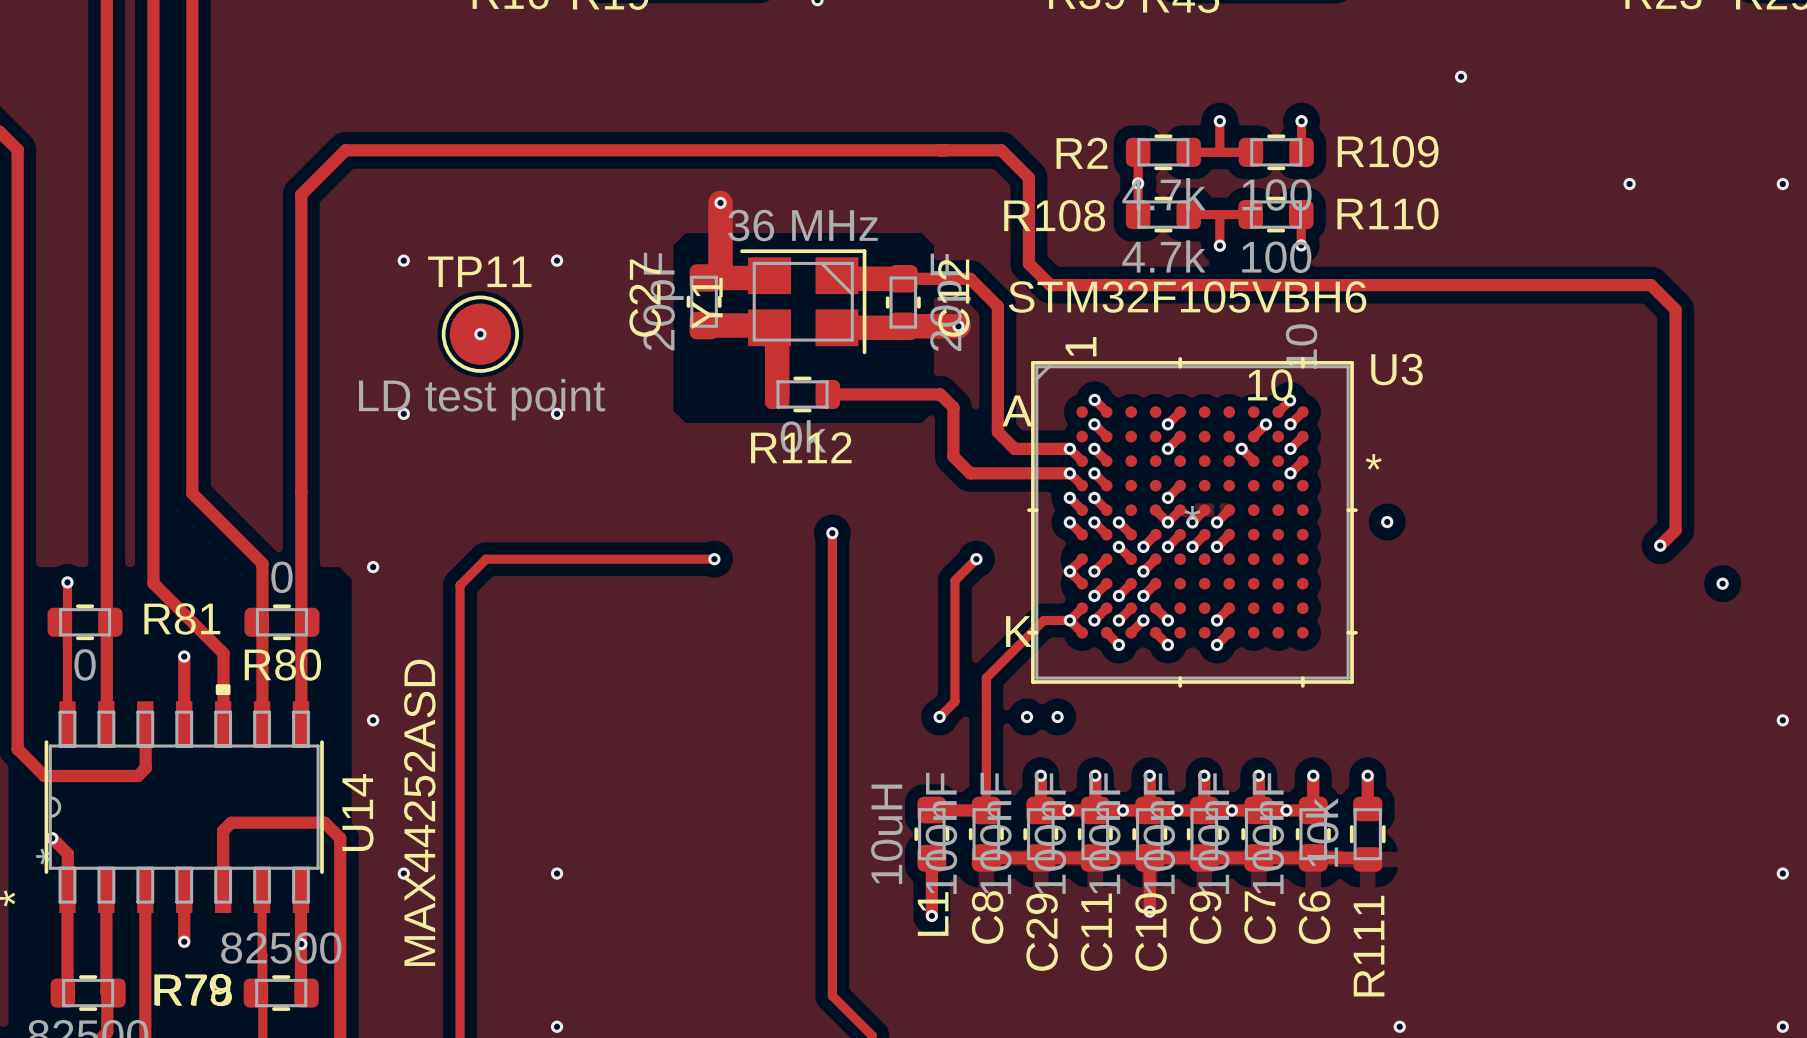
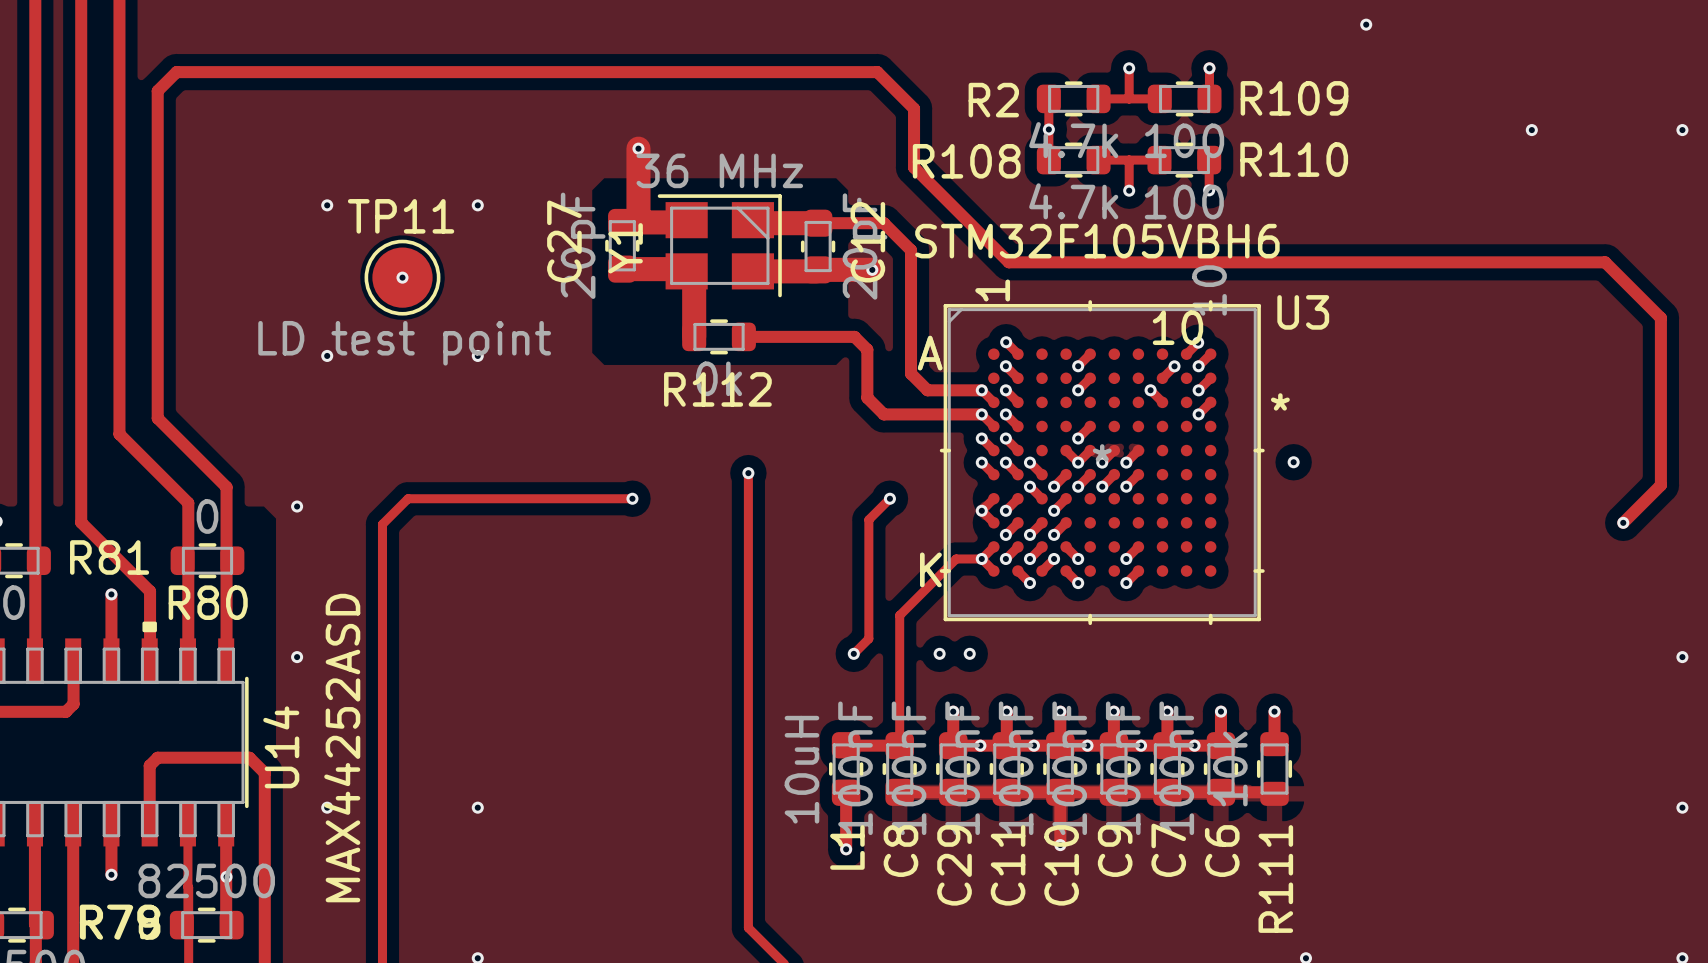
track: (1660, 545) (1675, 530) (1675, 309) (1651, 285) (1050, 285) (1028, 263) (1028, 177) (1001, 150) (345, 150) (301, 194) (301, 547) -> (1623, 522) (1660, 485) (1660, 318) (1605, 262) (1008, 262) (914, 167) (914, 108) (877, 72) (176, 72) (157, 91) (157, 418) (226, 487)
via: (1660, 545) -> none

